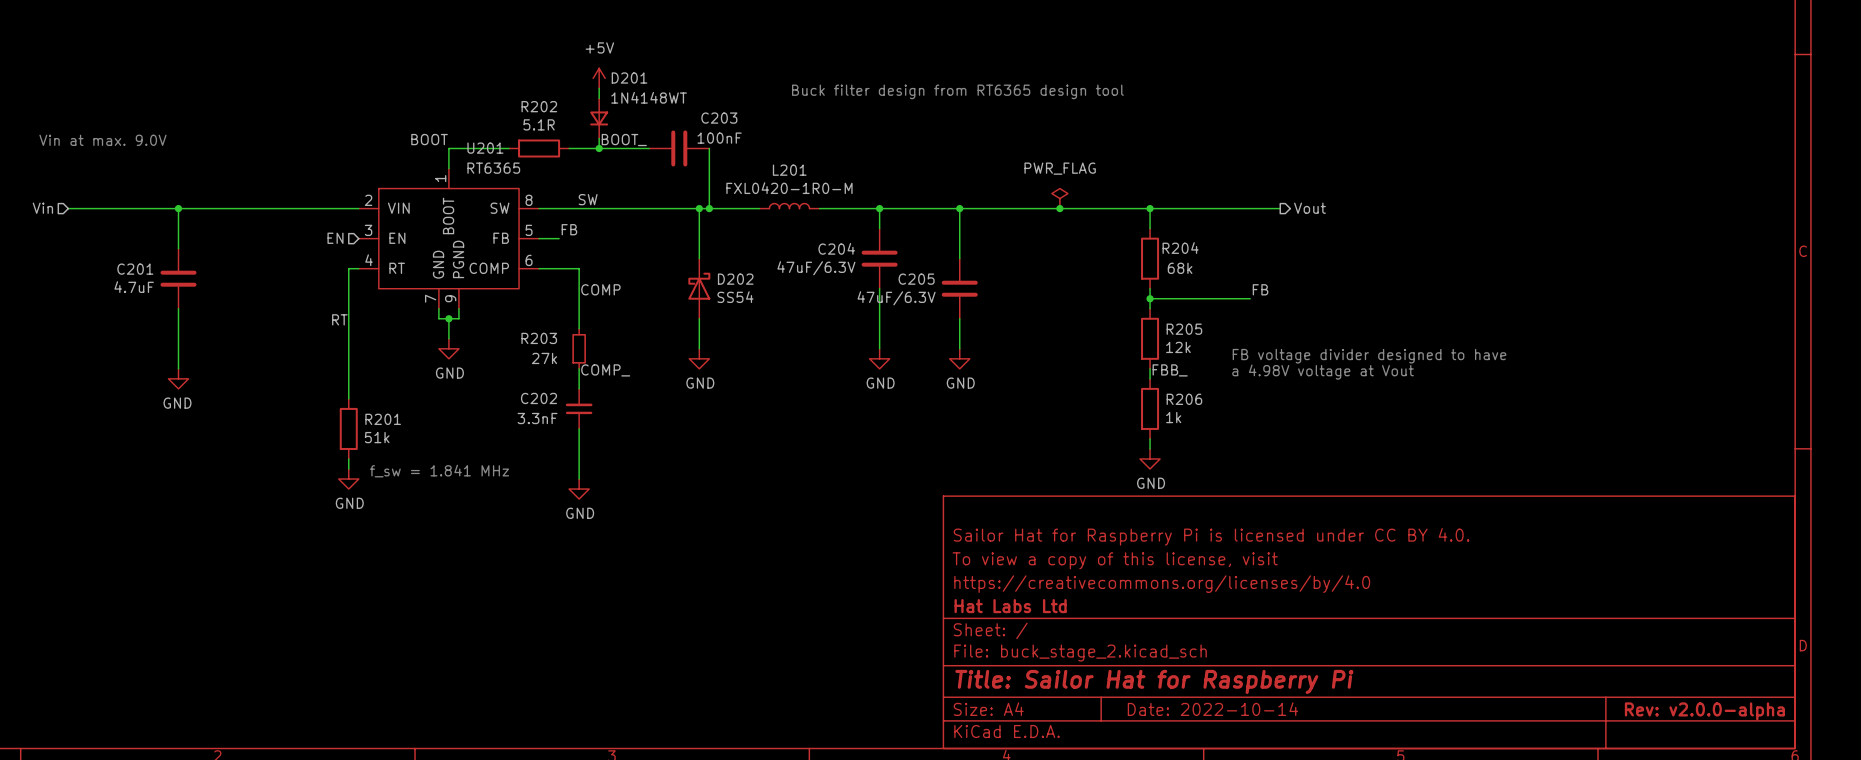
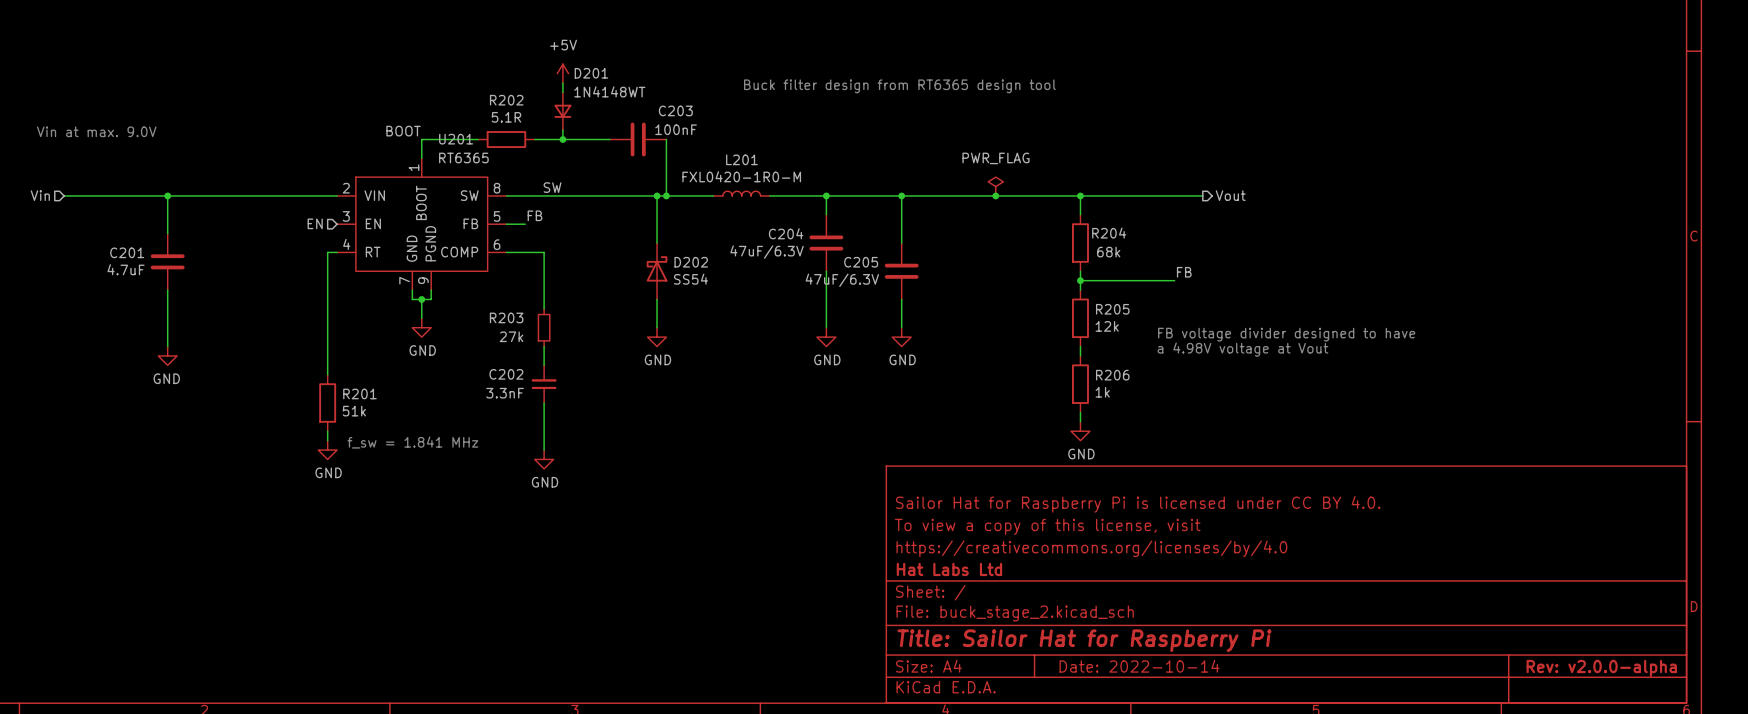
label: BOOT_ (624, 140) -> none
label: COMP (600, 289) -> none
label: RT (339, 319) -> none
label: COMP_ (605, 370) -> none
label: FBB_ (1170, 370) -> none

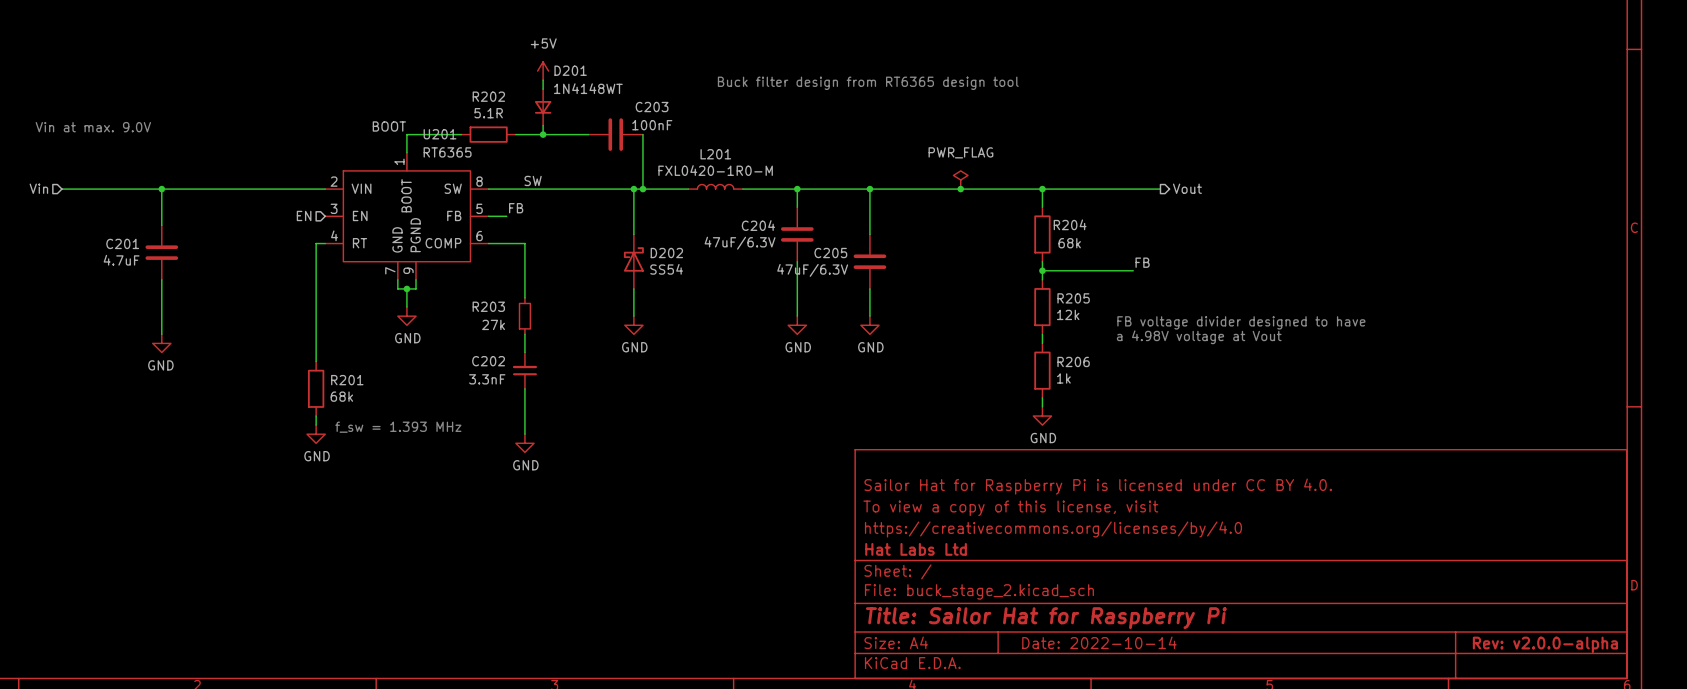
R201 value: 51k (354, 411) -> 68k (341, 396)
text: f_sw = 1.841 MHz (412, 442) -> f_sw = 1.393 MHz (398, 427)

